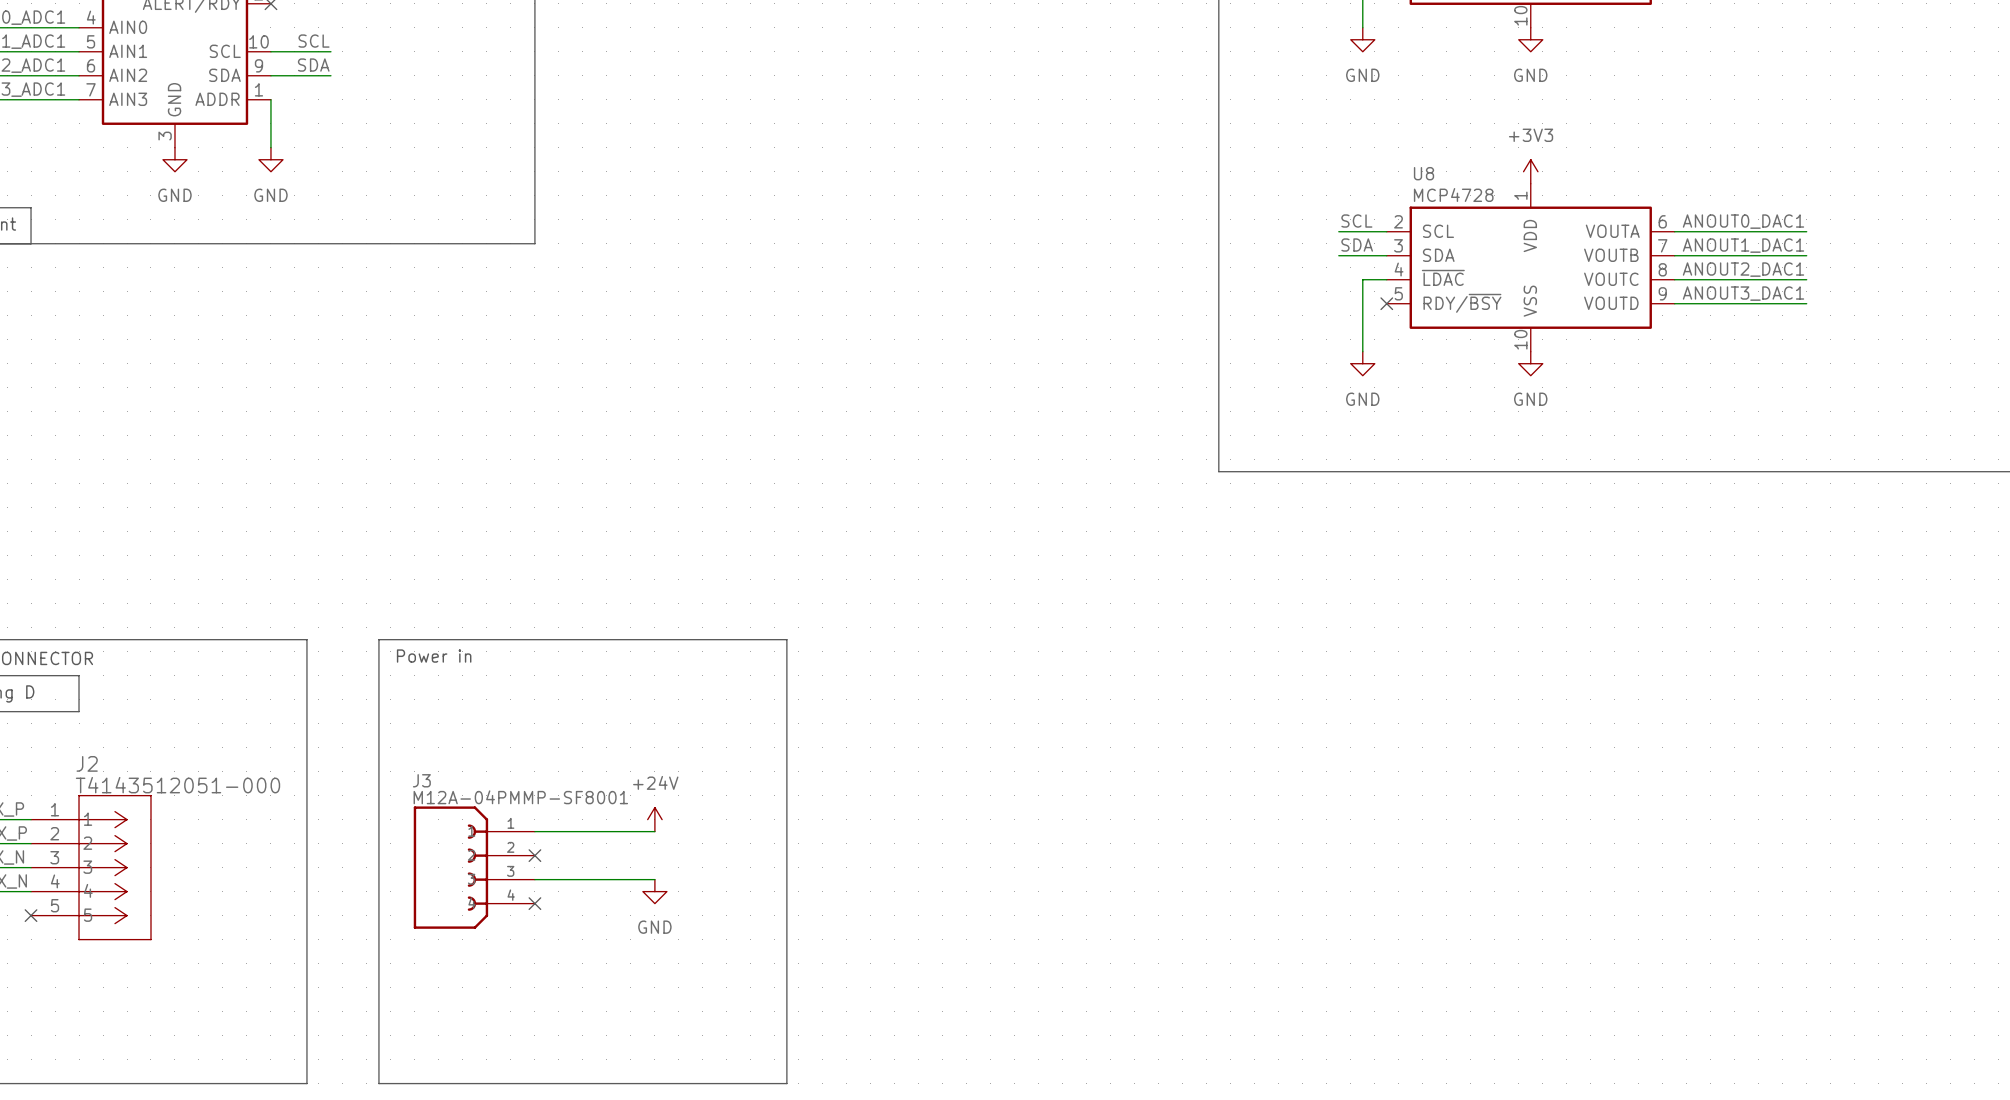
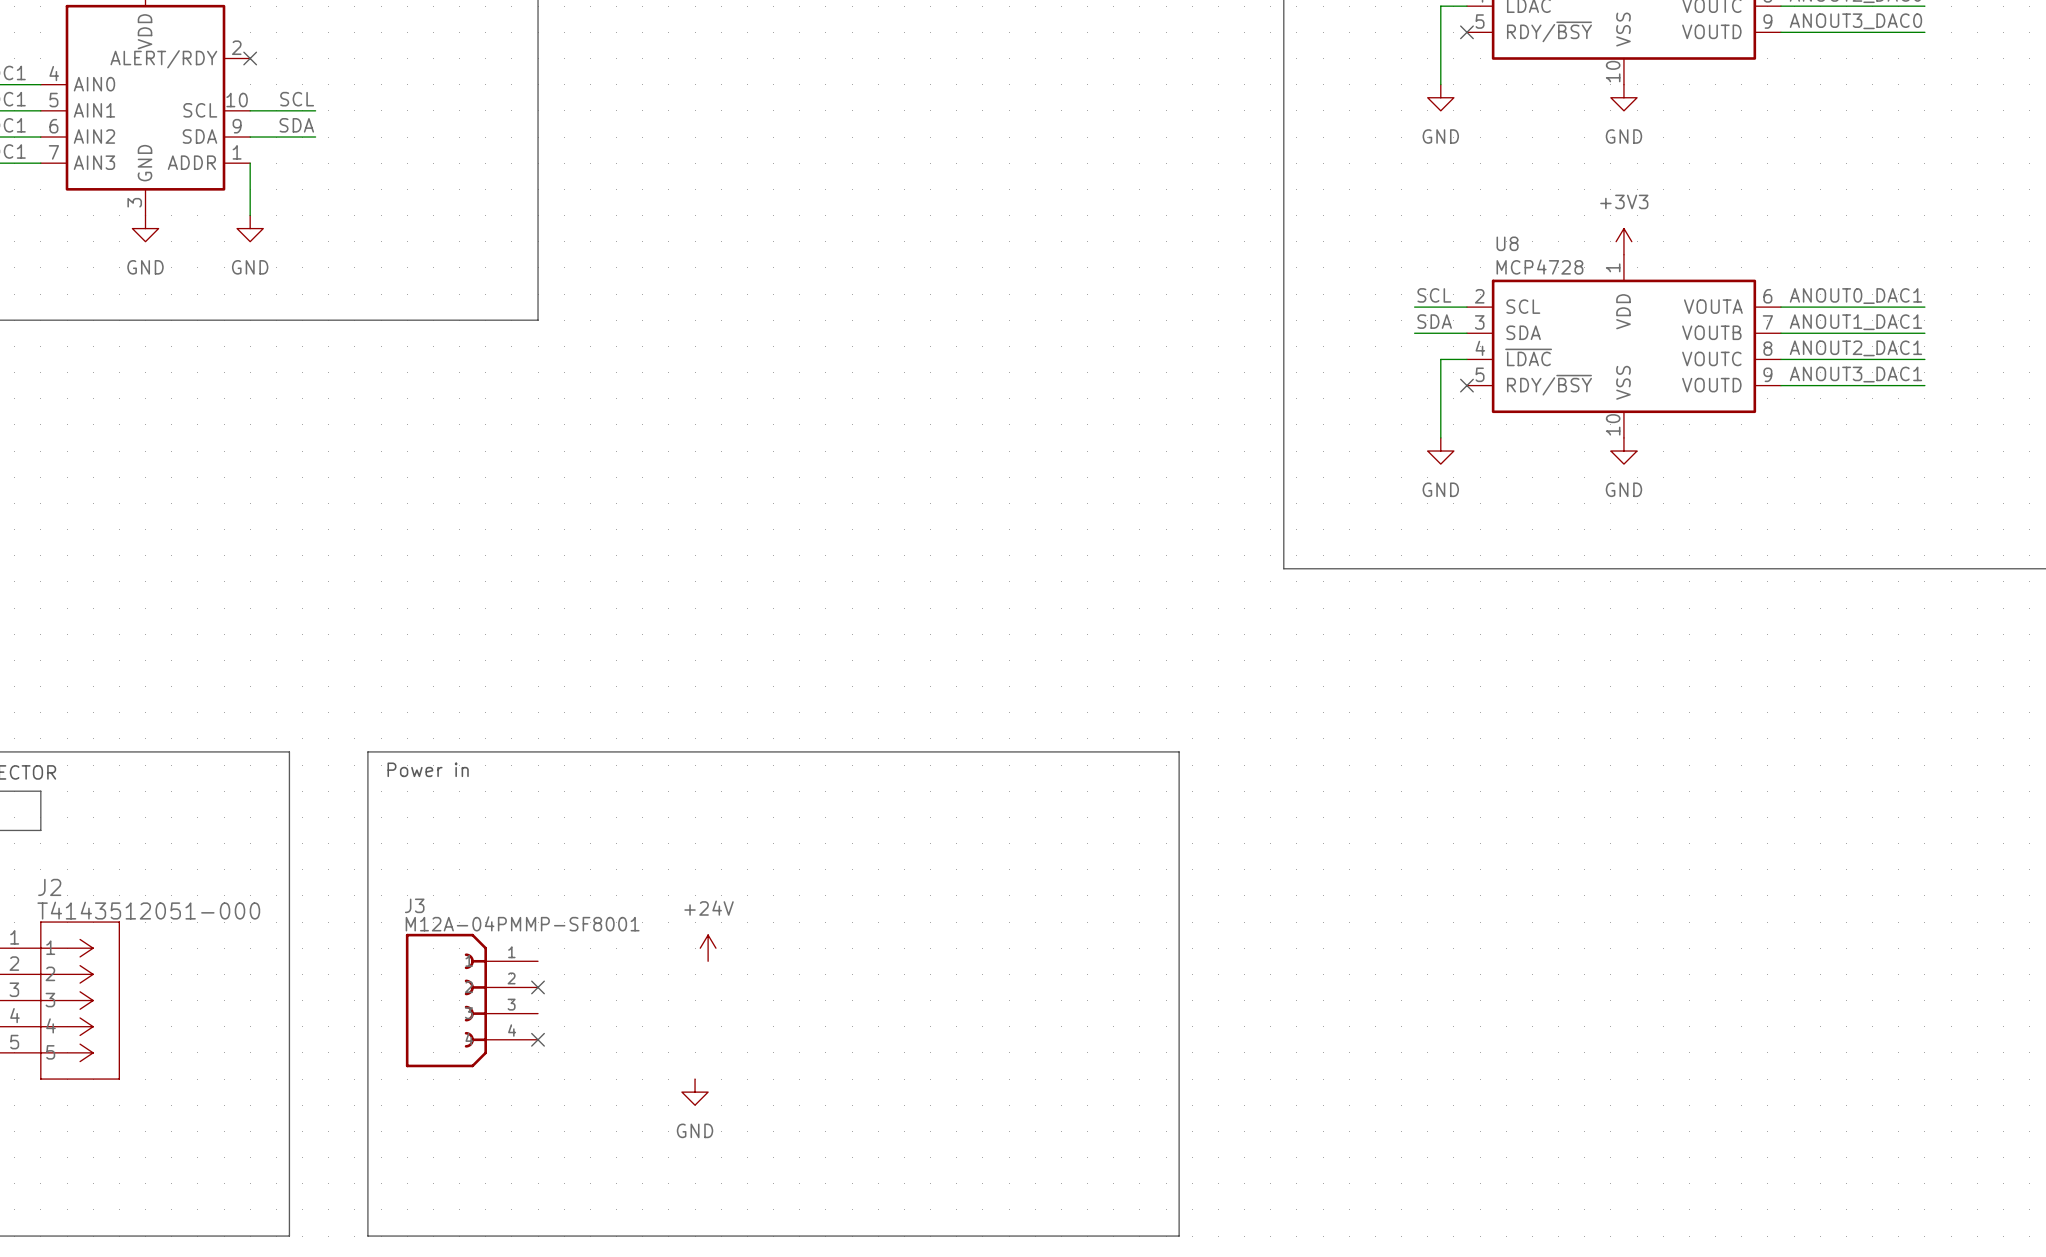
line: (786, 639) (786, 1083) -> (812, 751) (1179, 751) (1179, 1236) (812, 1236)
power symbol position: +24V (654, 819) -> +24V (708, 948)
wire: (534, 831) (654, 831) -> none
wire: (534, 879) (654, 879) -> none
power symbol position: GND (654, 891) -> GND (695, 1092)

